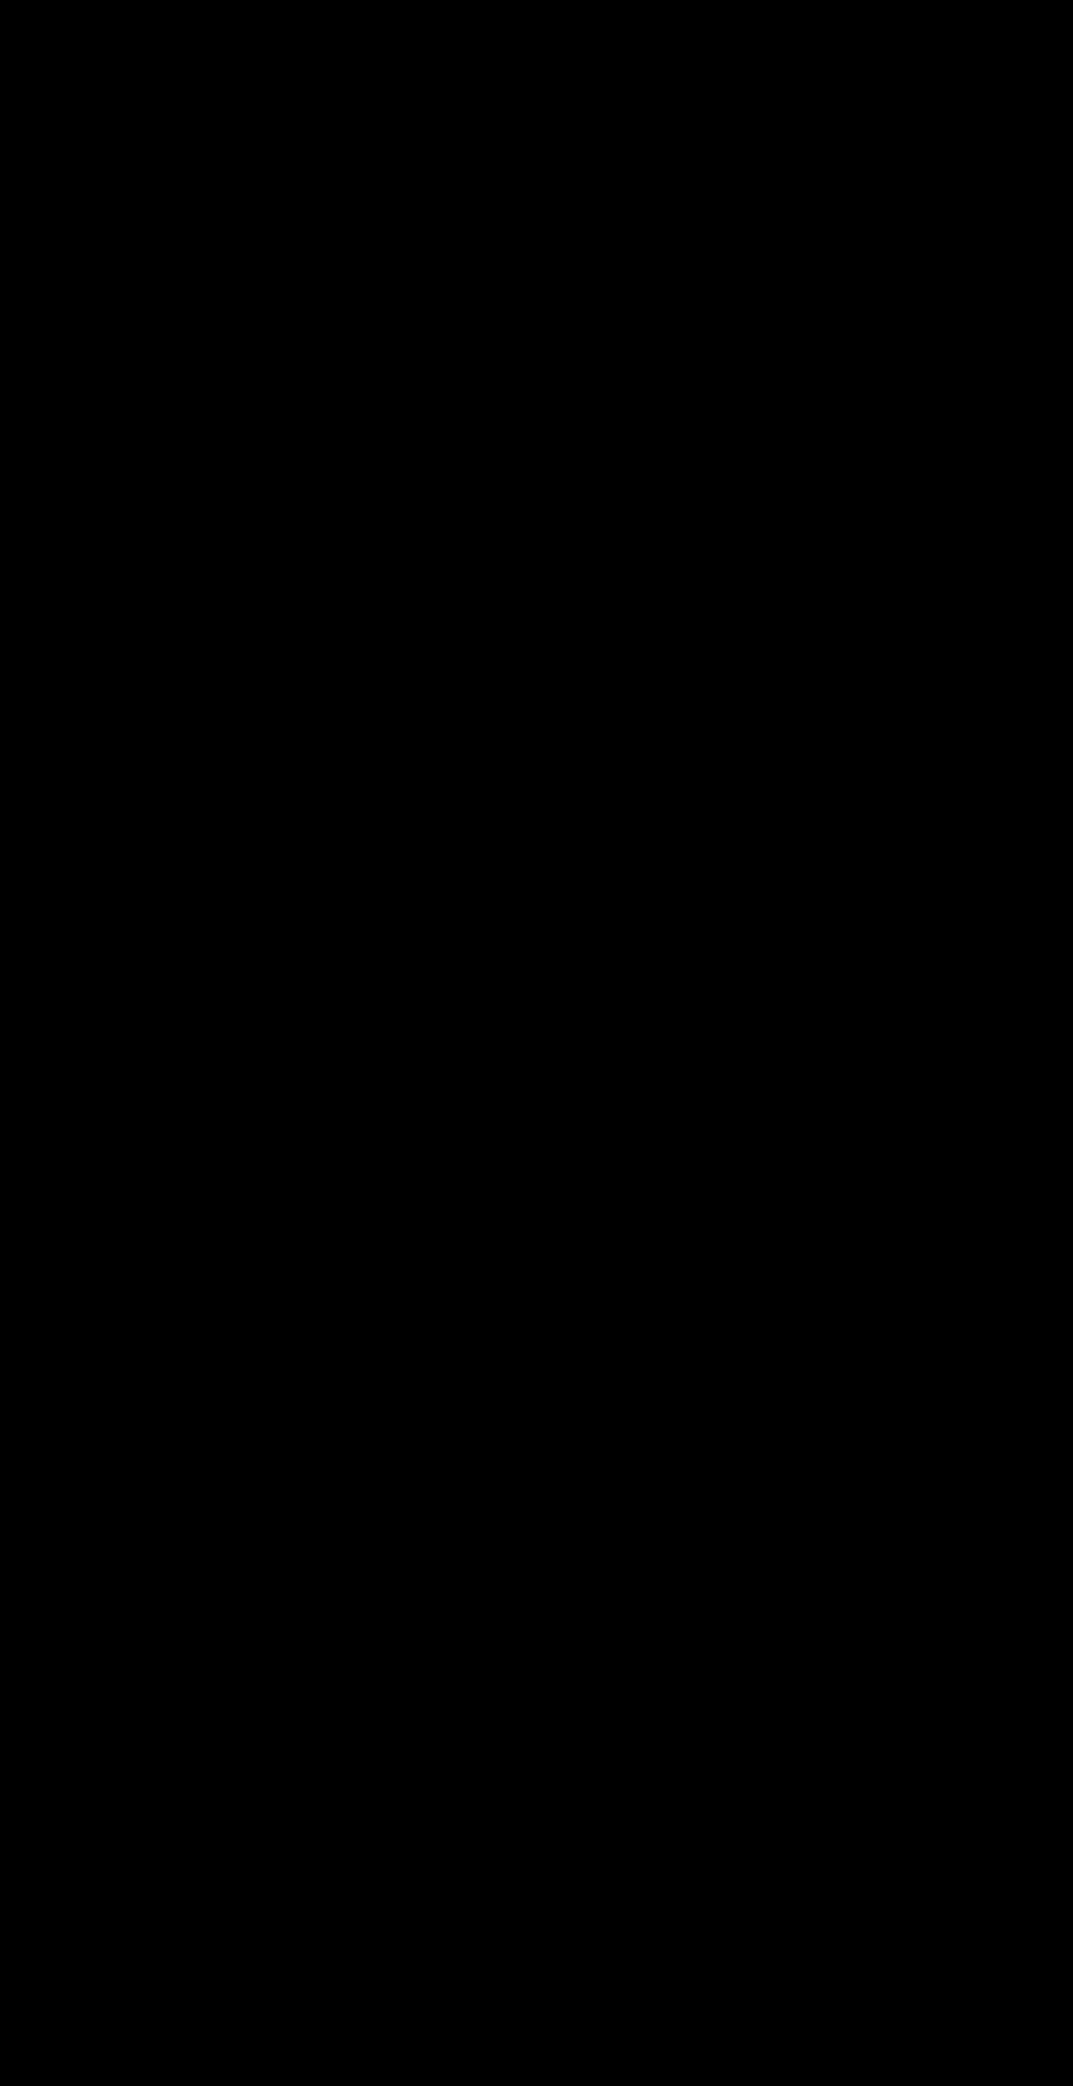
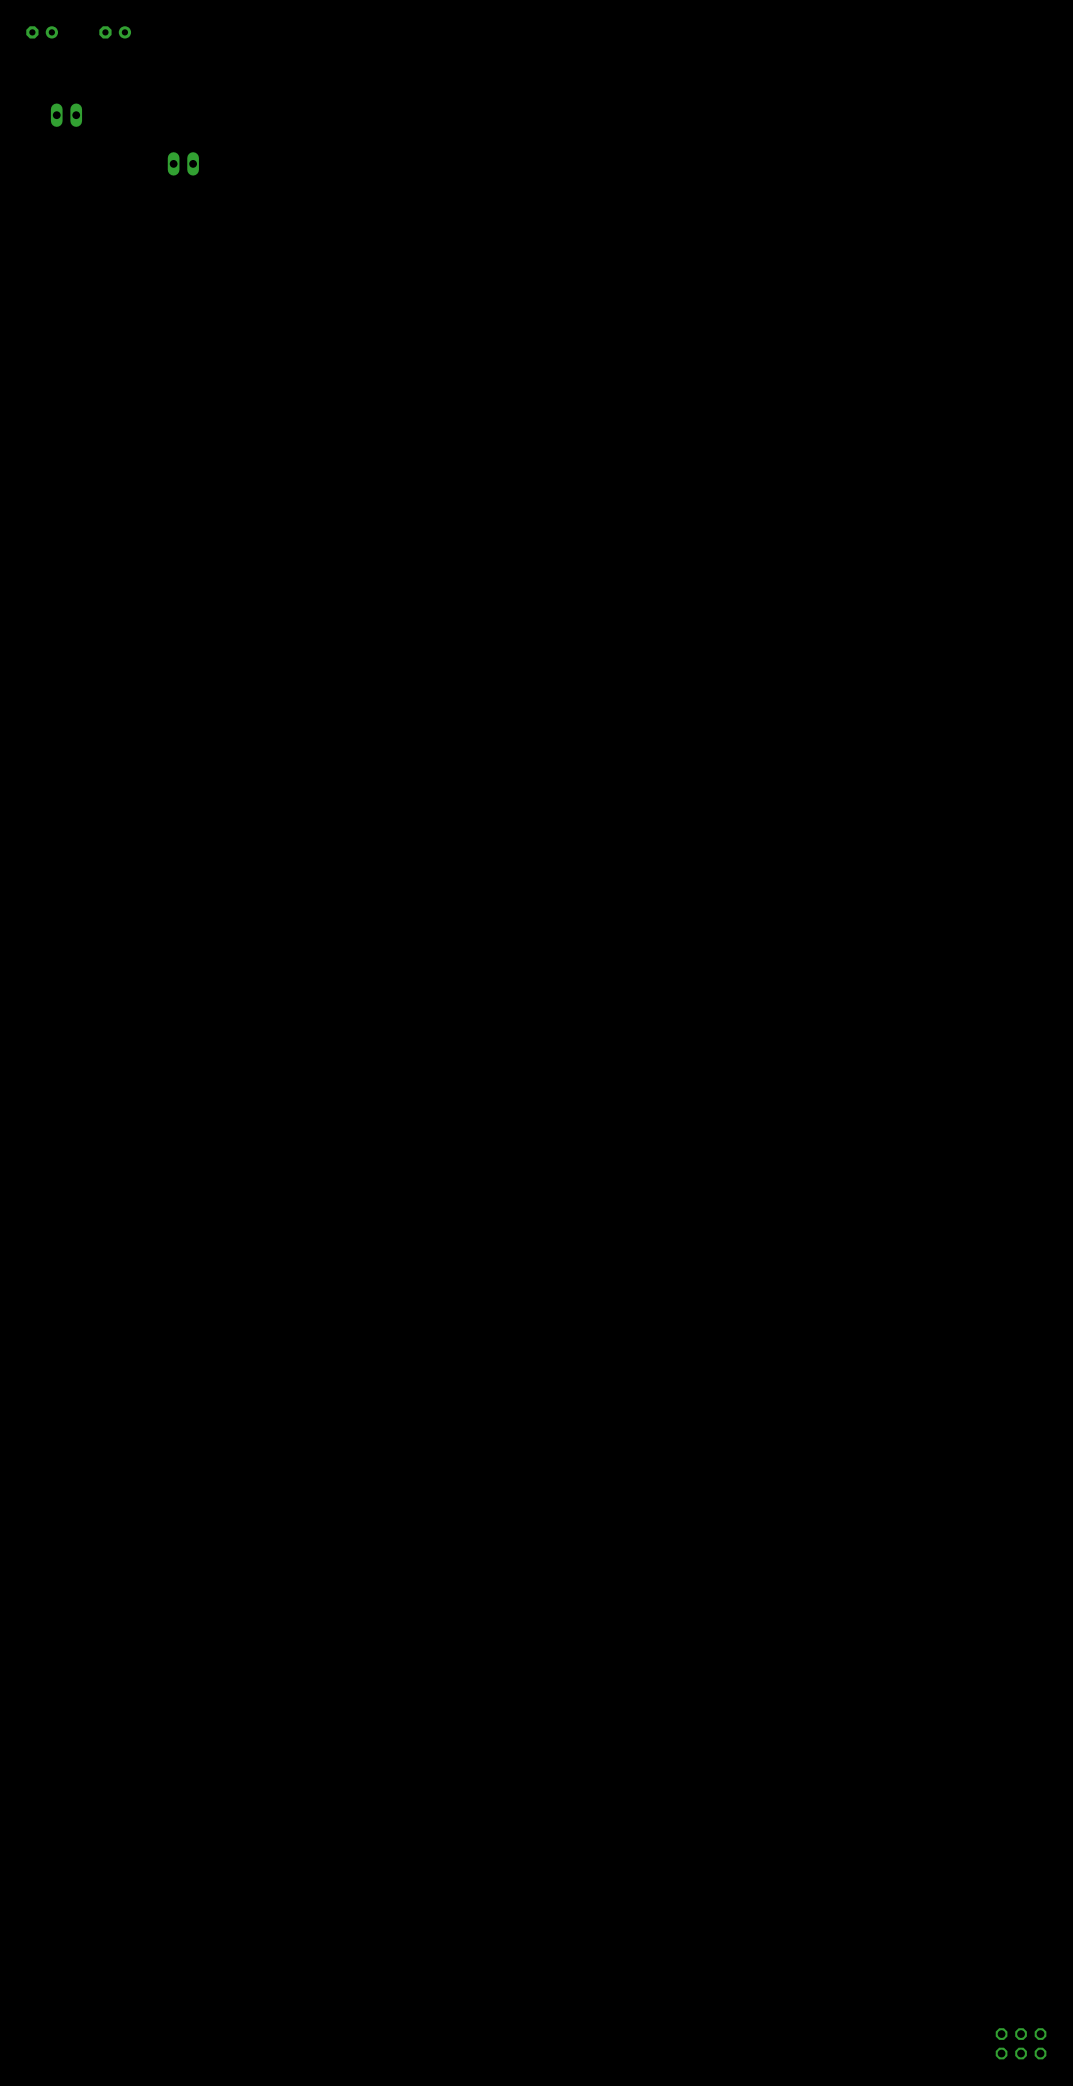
part: none -> (42, 32)
part: none -> (115, 32)
part: none -> (66, 115)
part: none -> (183, 163)
part: none -> (1021, 2043)

